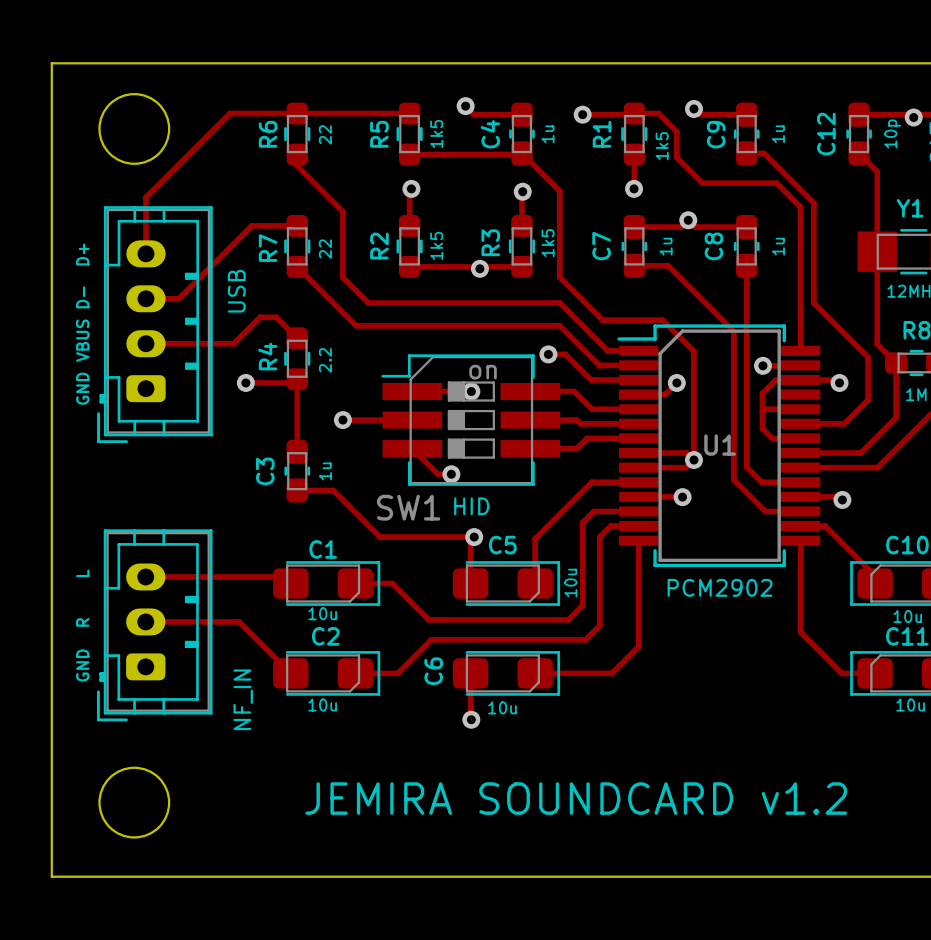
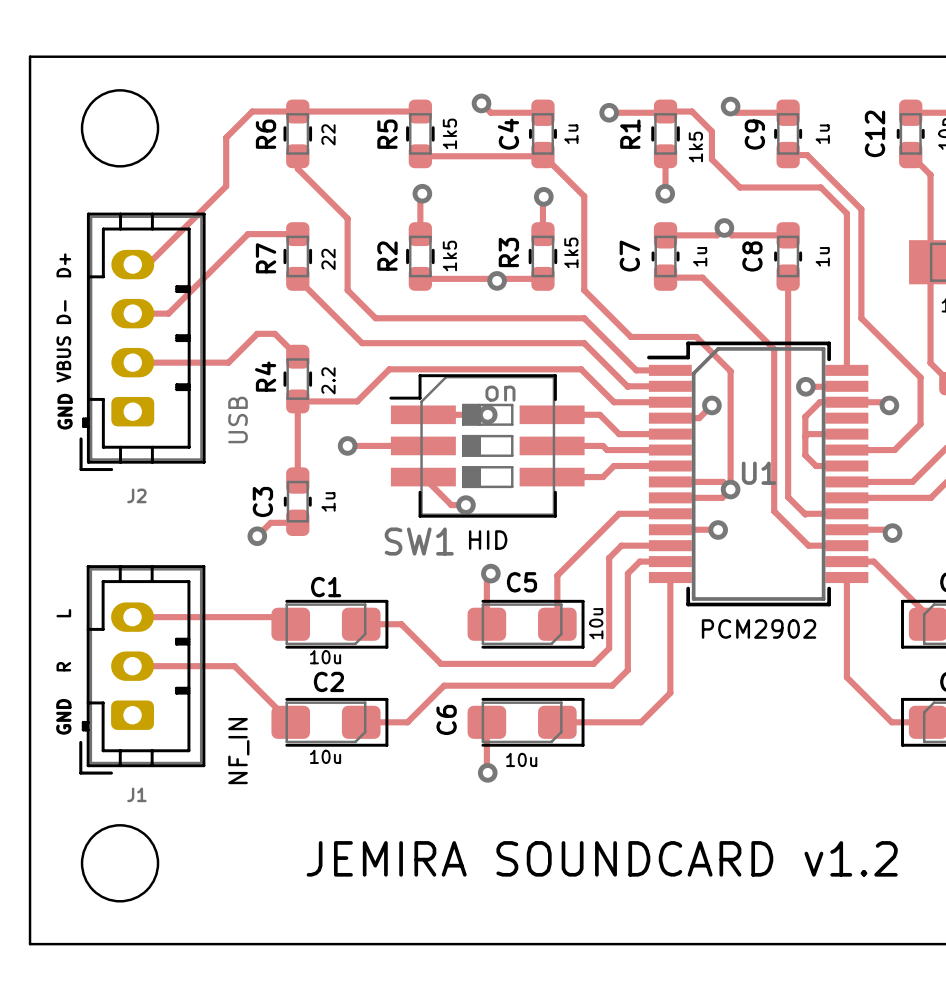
track: (255, 113) (229, 113) (145, 197) (145, 253) -> (252, 111) (226, 137) (226, 186) (147, 264) (132, 264)
USB name: USB (236, 291) -> J2 (136, 495)
track: (548, 354) (565, 354) (591, 380) -> (297, 401) (357, 401) (389, 369) (581, 369) (614, 402) (618, 402)
via: (548, 354) -> none
track: (245, 382) (293, 382) -> none
via position: (245, 382) -> (257, 536)
USB value: GND (82, 388) -> USB (238, 419)
text: none -> GND (65, 411)
track: (297, 490) (333, 490) (380, 537) (474, 537) -> (297, 522) (270, 522) (257, 536)
GND name: GND (82, 665) -> J1 (136, 794)
text: none -> GND (63, 716)

